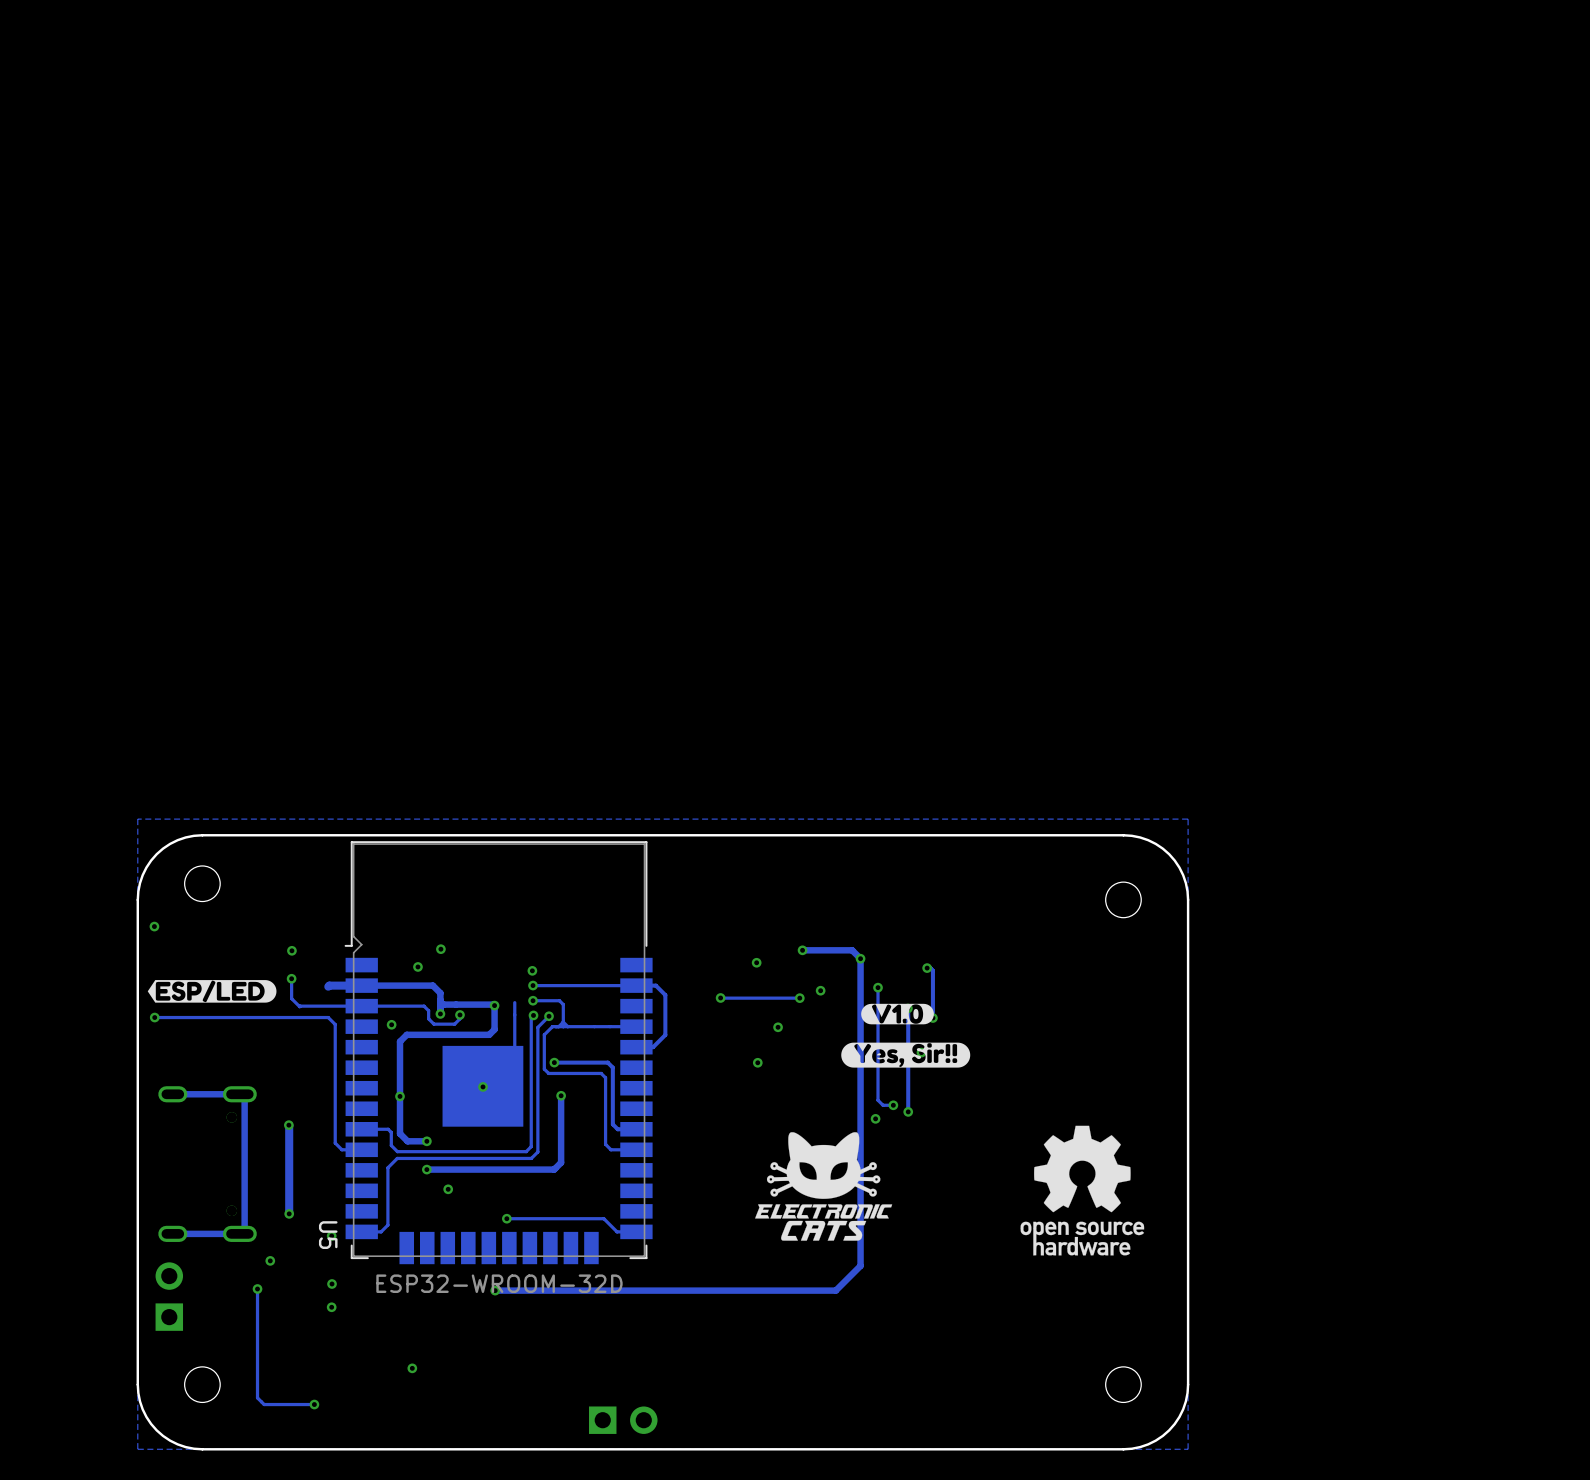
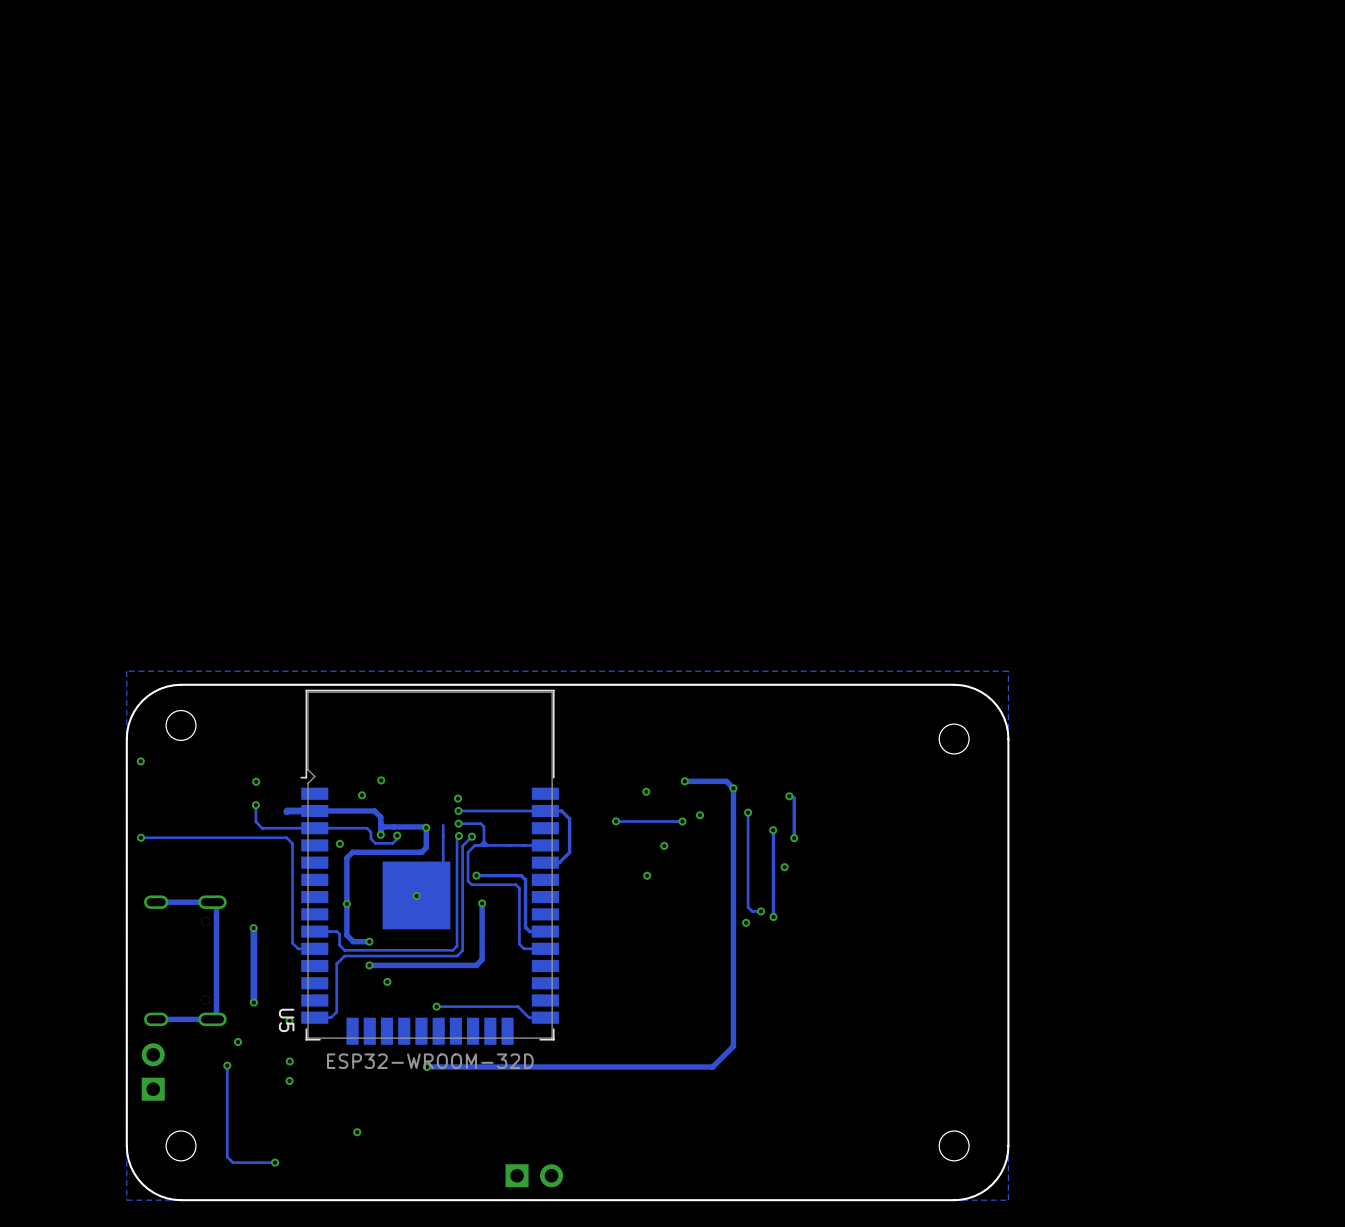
drawing: [147, 980, 277, 1003] -> none
drawing: [841, 1003, 971, 1068] -> none
drawing: [1020, 1125, 1145, 1256] -> none
drawing: [755, 1132, 893, 1241] -> none

